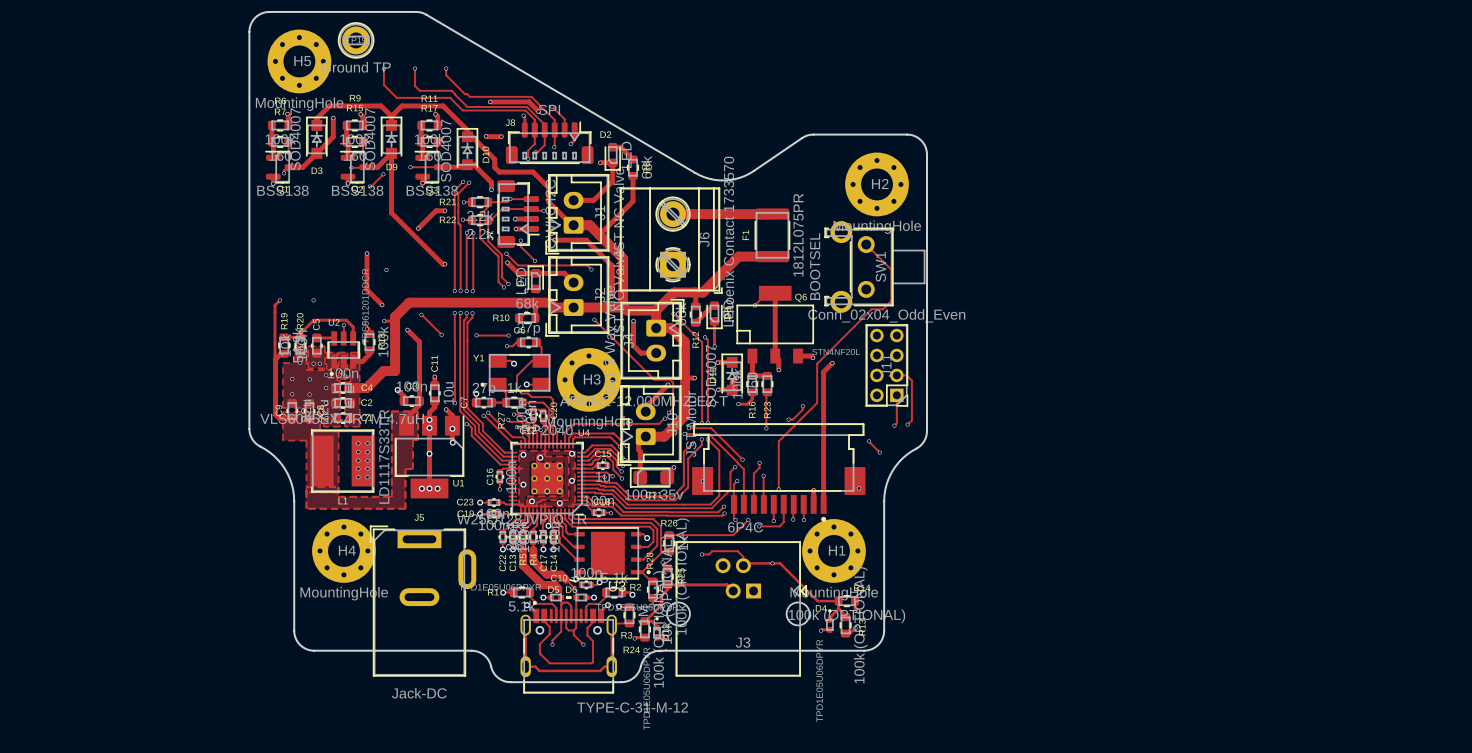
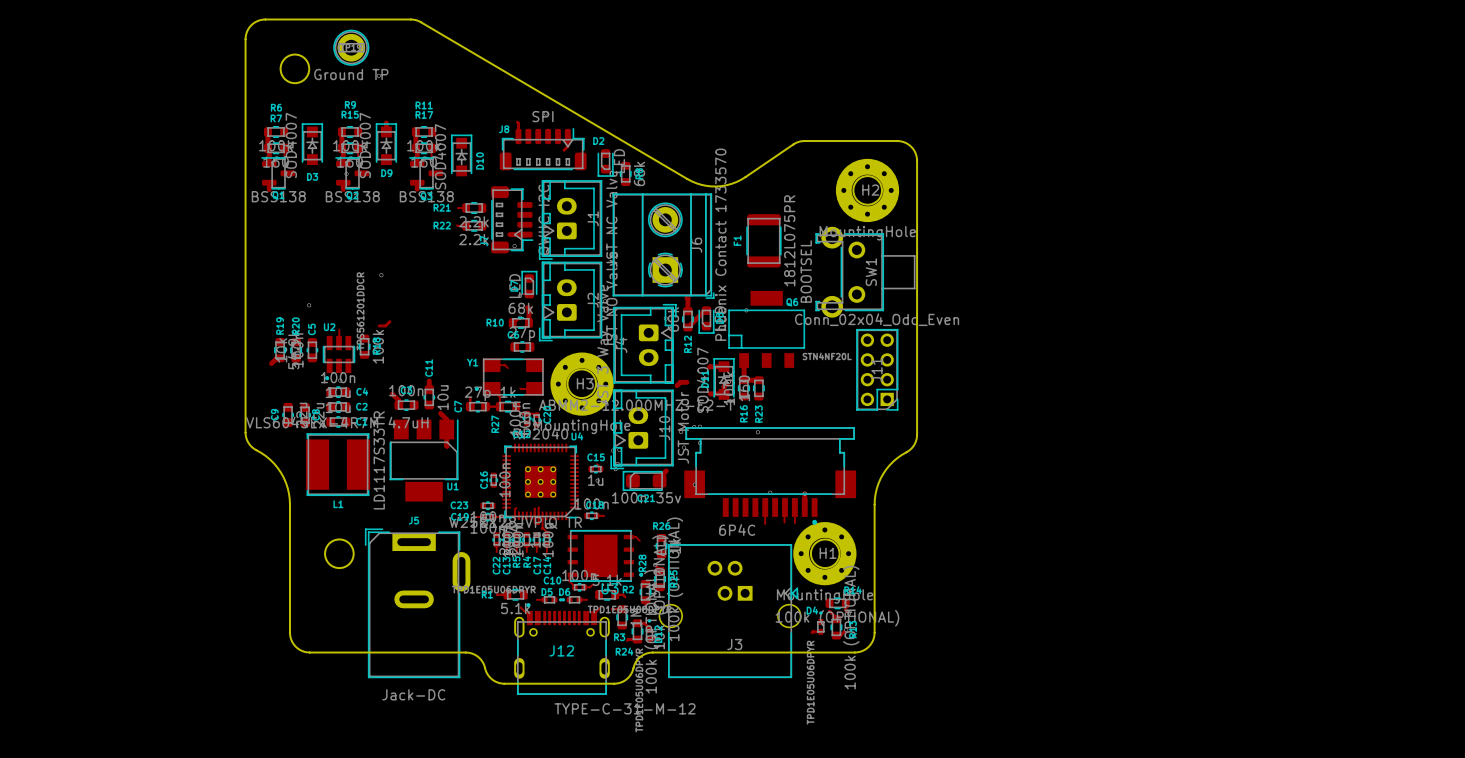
round board edge: none -> [279, 53, 311, 85]
H5: MountingHole (299, 61) -> none
track: (383, 68) (383, 84) (396, 97) (450, 97) (462, 110) (525, 110) (534, 119) (534, 143) (528, 150) (528, 158) -> none
track: (415, 68) (415, 85) (419, 90) (451, 90) (467, 107) (526, 107) (544, 124) (544, 145) (535, 152) -> none
via: (415, 68) -> none
track: (446, 68) (446, 75) (469, 96) (531, 96) (554, 120) (554, 147) -> none
via: (446, 68) -> none
track: (490, 101) (528, 101) (538, 111) -> none
via: (490, 101) -> none
track: (552, 106) (564, 119) (564, 129) -> none
via: (538, 111) -> none
track: (287, 114) (288, 125) -> none
via: (287, 114) -> none
track: (360, 114) (363, 116) (363, 125) -> none
via: (360, 114) -> none
track: (435, 114) (437, 116) (437, 125) -> none
via: (435, 114) -> none
via: (523, 115) -> none
track: (333, 118) (333, 136) (302, 167) (292, 167) (288, 170) (283, 170) (283, 173) -> none
via: (333, 118) -> none
track: (316, 125) (316, 118) (329, 105) (381, 105) (391, 116) (401, 105) (443, 105) (467, 130) (467, 136) (472, 136) (494, 159) (494, 167) (499, 172) (533, 172) (548, 187) (548, 202) (571, 225) (589, 225) (623, 258) (623, 306) (627, 310) (656, 310) -> none
track: (486, 136) (501, 136) -> none
via: (486, 136) -> none
via: (501, 136) -> none
via: (570, 143) -> none
via: (554, 147) -> none
track: (612, 147) (620, 147) (633, 159) -> none
via: (535, 152) -> none
via: (528, 158) -> none
track: (600, 162) (612, 162) (612, 181) (593, 200) (573, 200) -> none
via: (600, 162) -> none
track: (351, 167) (377, 167) (391, 153) (391, 212) (444, 264) -> none
track: (410, 167) (464, 167) (467, 164) (473, 164) (491, 182) (491, 189) -> none
via: (410, 167) -> none
round board edge: none -> [852, 175, 884, 206]
via: (283, 173) -> none
track: (383, 174) (370, 186) -> none
via: (383, 174) -> none
track: (633, 175) (633, 201) (599, 234) -> none
track: (463, 181) (454, 190) (454, 291) -> none
via: (463, 181) -> none
track: (469, 182) (458, 193) (458, 223) (460, 225) (460, 290) -> none
via: (469, 182) -> none
via: (273, 183) -> none
via: (347, 183) -> none
via: (422, 183) -> none
via: (370, 186) -> none
via: (491, 189) -> none
via: (510, 199) -> none
track: (531, 199) (488, 202) (488, 206) (480, 215) (480, 238) (498, 256) (498, 281) (503, 287) -> none
via: (463, 202) -> none
track: (444, 210) (436, 210) (418, 228) -> none
via: (444, 210) -> none
track: (543, 210) (502, 209) (491, 220) (488, 220) (488, 241) (501, 254) (501, 277) (508, 283) -> none
via: (543, 210) -> none
track: (672, 214) (772, 214) -> none
via: (462, 219) -> none
track: (515, 219) (531, 219) -> none
via: (515, 219) -> none
via: (418, 228) -> none
via: (516, 229) -> none
track: (466, 232) (466, 291) -> none
via: (466, 232) -> none
track: (473, 233) (472, 291) -> none
via: (473, 233) -> none
track: (520, 240) (520, 246) (535, 260) -> none
track: (554, 240) (586, 240) (612, 265) (612, 296) -> none
via: (554, 240) -> none
track: (866, 244) (891, 269) (891, 300) (883, 309) (871, 309) (817, 363) (817, 402) (778, 441) (778, 489) -> none
track: (366, 253) (366, 289) (382, 304) -> none
via: (366, 253) -> none
track: (506, 253) (518, 265) (587, 265) (591, 269) -> none
via: (506, 253) -> none
track: (772, 256) (738, 256) (702, 292) (674, 292) (656, 310) -> none
via: (535, 260) -> none
track: (507, 262) (518, 273) (564, 273) (573, 282) -> none
via: (507, 262) -> none
via: (444, 264) -> none
via: (591, 269) -> none
via: (508, 283) -> none
via: (503, 287) -> none
via: (460, 290) -> none
via: (454, 291) -> none
via: (466, 291) -> none
via: (472, 291) -> none
track: (279, 300) (275, 305) (275, 414) (279, 418) (292, 418) -> none
via: (279, 300) -> none
via: (382, 304) -> none
track: (754, 305) (766, 293) (775, 293) (775, 356) (778, 359) (778, 369) -> none
track: (624, 307) (554, 307) (549, 302) (409, 302) (395, 316) (395, 370) (383, 370) (366, 387) (350, 387) -> none
track: (656, 310) (656, 328) (671, 328) (684, 341) (684, 416) (664, 436) (645, 436) (638, 443) (640, 477) -> none
track: (454, 313) (455, 403) -> none
via: (454, 313) -> none
track: (460, 313) (460, 410) (475, 426) (475, 433) (502, 460) (512, 460) -> none
via: (460, 313) -> none
track: (466, 313) (466, 317) (463, 320) (463, 409) (478, 424) (478, 431) (503, 456) (512, 456) -> none
via: (466, 313) -> none
track: (472, 313) (472, 317) (467, 322) (467, 408) (482, 423) (482, 430) (504, 452) (512, 452) -> none
via: (472, 313) -> none
track: (673, 313) (702, 342) (702, 423) -> none
track: (421, 314) (441, 334) -> none
via: (421, 314) -> none
track: (594, 319) (654, 379) (670, 379) (673, 382) (673, 408) (668, 412) -> none
via: (594, 319) -> none
via: (384, 321) -> none
track: (633, 321) (633, 345) (640, 353) (656, 353) -> none
via: (633, 321) -> none
track: (714, 321) (714, 346) -> none
track: (364, 323) (369, 328) (369, 333) -> none
via: (364, 323) -> none
via: (343, 325) -> none
track: (407, 329) (419, 342) (419, 405) (406, 417) (406, 425) -> none
via: (407, 329) -> none
via: (441, 334) -> none
track: (476, 335) (508, 335) -> none
via: (476, 335) -> none
via: (508, 335) -> none
track: (284, 337) (300, 337) (300, 333) (313, 320) (346, 320) (353, 327) (353, 338) -> none
track: (316, 337) (334, 338) -> none
track: (705, 337) (707, 340) (707, 422) -> none
via: (705, 337) -> none
track: (520, 342) (516, 342) (512, 346) (506, 346) -> none
track: (536, 342) (541, 347) (541, 360) (532, 360) (517, 375) (517, 388) (521, 393) (528, 393) (531, 397) (550, 397) (553, 399) (553, 444) -> none
zone outline: (294, 346) (294, 362) (282, 362) (282, 407) (323, 407) (323, 426) (340, 426) (340, 380) (337, 380) (337, 352) (326, 352) (326, 370) (306, 370) (306, 346) (294, 346) -> none
zone outline: (308, 346) (308, 368) (324, 368) (324, 346) (308, 346) -> none
via: (506, 346) -> none
via: (714, 346) -> none
track: (369, 350) (369, 354) (362, 361) (353, 361) -> none
zone outline: (338, 352) (347, 352) (347, 378) (338, 378) (338, 352) -> none
zone outline: (350, 352) (350, 382) (344, 382) (344, 426) (359, 426) (359, 352) (350, 352) -> none
track: (798, 356) (811, 356) (812, 357) -> none
via: (812, 357) -> none
via: (300, 362) -> none
via: (717, 362) -> none
via: (313, 363) -> none
via: (319, 363) -> none
via: (514, 363) -> none
track: (832, 363) (823, 371) (823, 504) -> none
via: (832, 363) -> none
round board edge: none -> [566, 368, 598, 400]
via: (778, 369) -> none
via: (341, 372) -> none
via: (326, 375) -> none
track: (896, 375) (906, 375) (911, 380) (911, 420) (907, 424) -> none
via: (434, 376) -> none
via: (694, 378) -> none
via: (292, 379) -> none
via: (309, 379) -> none
via: (526, 384) -> none
track: (668, 384) (645, 407) (645, 411) -> none
via: (668, 384) -> none
via: (326, 387) -> none
via: (397, 389) -> none
via: (718, 389) -> none
track: (752, 392) (752, 399) (747, 404) (738, 404) -> none
track: (767, 392) (766, 428) -> none
via: (476, 393) -> none
via: (292, 394) -> none
via: (309, 394) -> none
track: (896, 395) (896, 423) (894, 425) -> none
track: (434, 400) (434, 407) (429, 412) (429, 488) -> none
via: (326, 402) -> none
track: (522, 402) (543, 402) (549, 408) (549, 444) -> none
via: (455, 403) -> none
via: (738, 404) -> none
track: (802, 406) (802, 409) (792, 419) (788, 419) -> none
via: (802, 406) -> none
via: (446, 409) -> none
track: (488, 412) (512, 437) (523, 437) (525, 444) -> none
via: (488, 412) -> none
via: (668, 412) -> none
track: (514, 414) (519, 414) (537, 432) (537, 444) -> none
via: (514, 414) -> none
track: (483, 415) (513, 444) (521, 444) -> none
via: (483, 415) -> none
track: (665, 418) (658, 423) (573, 423) (565, 432) (565, 444) -> none
via: (665, 418) -> none
via: (429, 419) -> none
track: (508, 419) (510, 421) (521, 421) (533, 434) -> none
via: (508, 419) -> none
track: (533, 419) (533, 423) (541, 430) (541, 444) -> none
via: (788, 419) -> none
track: (543, 420) (545, 425) (545, 454) -> none
track: (466, 424) (471, 427) (471, 435) (500, 464) (512, 464) -> none
via: (466, 424) -> none
via: (907, 424) -> none
via: (894, 425) -> none
via: (429, 427) -> none
track: (516, 427) (519, 427) (529, 436) (529, 444) -> none
via: (516, 427) -> none
via: (452, 428) -> none
track: (688, 428) (711, 428) (742, 459) -> none
via: (540, 429) -> none
track: (558, 429) (557, 444) -> none
via: (558, 429) -> none
track: (533, 434) (533, 444) -> none
track: (684, 434) (709, 434) (743, 469) (743, 504) -> none
via: (684, 434) -> none
track: (701, 439) (701, 444) (688, 458) (688, 487) (675, 500) (628, 500) (615, 486) (581, 484) -> none
via: (701, 439) -> none
track: (707, 439) (719, 450) (719, 495) (710, 504) (627, 504) (613, 490) (581, 488) -> none
track: (869, 441) (879, 452) -> none
via: (869, 441) -> none
via: (452, 442) -> none
via: (358, 443) -> none
via: (367, 443) -> none
track: (691, 443) (683, 451) (683, 485) (672, 496) (629, 496) (616, 482) (581, 480) -> none
track: (569, 444) (569, 437) (573, 433) (614, 433) (626, 446) -> none
track: (573, 444) (574, 437) (610, 437) (620, 446) -> none
zone outline: (519, 450) (574, 450) (574, 506) (519, 506) (519, 450) -> none
via: (358, 451) -> none
via: (367, 452) -> none
track: (581, 452) (585, 452) (592, 445) (611, 445) (624, 460) -> none
via: (879, 452) -> none
via: (429, 453) -> none
via: (572, 453) -> none
via: (523, 454) -> none
zone outline: (536, 454) (536, 462) (562, 462) (562, 496) (526, 496) (526, 506) (536, 506) (536, 502) (540, 502) (540, 500) (568, 500) (568, 456) (536, 454) -> none
track: (581, 456) (587, 456) (595, 448) (610, 448) (620, 459) (622, 465) -> none
via: (540, 457) -> none
via: (742, 459) -> none
via: (358, 460) -> none
via: (367, 460) -> none
track: (581, 460) (588, 460) (597, 452) (608, 452) (616, 460) (616, 466) (621, 471) -> none
via: (604, 460) -> none
track: (759, 462) (759, 467) (753, 473) (753, 504) -> none
via: (759, 462) -> none
track: (581, 464) (591, 464) (595, 459) (606, 456) (613, 462) (613, 469) (622, 478) -> none
track: (596, 464) (592, 468) (573, 468) -> none
via: (674, 467) -> none
track: (735, 467) (730, 471) (730, 489) (711, 508) (626, 508) (611, 494) (581, 492) -> none
via: (735, 467) -> none
via: (358, 468) -> none
via: (367, 468) -> none
track: (521, 468) (503, 468) (499, 472) -> none
via: (621, 471) -> none
track: (581, 472) (607, 472) (612, 476) -> none
track: (763, 475) (763, 504) -> none
via: (763, 475) -> none
track: (581, 476) (604, 477) -> none
via: (612, 476) -> none
via: (358, 477) -> none
via: (367, 477) -> none
via: (622, 478) -> none
via: (572, 480) -> none
track: (499, 481) (499, 489) -> none
track: (737, 481) (733, 484) (735, 520) -> none
via: (737, 481) -> none
via: (523, 484) -> none
zone outline: (306, 487) (338, 487) (338, 496) (391, 496) (391, 411) (417, 411) (417, 440) (413, 440) (413, 468) (405, 468) (405, 508) (306, 508) (306, 440) (282, 440) (282, 412) (320, 412) (320, 431) (338, 431) (338, 492) (306, 492) -> none
via: (421, 488) -> none
via: (429, 488) -> none
via: (437, 488) -> none
via: (859, 488) -> none
via: (499, 489) -> none
track: (581, 496) (587, 496) (594, 502) (614, 502) (623, 511) (718, 512) (723, 506) -> none
track: (581, 500) (586, 500) (592, 506) (612, 506) (621, 515) (722, 515) (724, 513) -> none
via: (532, 501) -> none
track: (480, 502) (489, 502) -> none
via: (480, 502) -> none
track: (498, 502) (522, 504) (525, 507) (525, 519) (514, 520) (502, 532) -> none
track: (529, 502) (529, 520) (525, 523) (521, 523) (512, 532) -> none
via: (559, 503) -> none
track: (572, 504) (585, 504) (594, 512) -> none
track: (783, 504) (783, 522) (779, 526) (759, 526) -> none
via: (723, 506) -> none
track: (532, 512) (532, 522) (523, 531) -> none
track: (537, 512) (537, 525) (533, 531) -> none
track: (553, 512) (553, 520) (559, 528) (559, 542) (576, 559) (579, 559) -> none
track: (557, 512) (557, 519) (562, 526) (562, 535) (573, 546) (579, 546) -> none
track: (561, 512) (561, 521) (566, 525) (566, 531) (568, 534) (579, 534) -> none
track: (565, 512) (565, 519) (572, 526) (649, 526) (653, 530) (653, 541) (648, 546) (636, 546) -> none
track: (569, 512) (569, 518) (573, 522) (650, 522) (657, 529) (657, 545) (643, 559) (636, 559) -> none
track: (573, 512) (574, 519) (653, 519) (661, 526) (661, 553) -> none
via: (610, 513) -> none
via: (724, 513) -> none
via: (480, 514) -> none
via: (793, 519) -> none
via: (735, 520) -> none
track: (748, 520) (733, 535) (669, 535) -> none
via: (748, 520) -> none
via: (803, 520) -> none
track: (545, 521) (542, 523) (543, 532) -> none
via: (773, 521) -> none
via: (548, 525) -> none
via: (759, 526) -> none
round board edge: none -> [324, 538, 355, 570]
round board edge: none -> [809, 538, 841, 570]
via: (647, 538) -> none
via: (502, 549) -> none
track: (522, 549) (522, 565) (542, 585) (554, 585) (561, 591) (561, 597) -> none
track: (533, 549) (533, 561) (546, 574) (560, 574) (576, 590) (576, 628) (573, 630) -> none
via: (543, 549) -> none
via: (553, 549) -> none
H4: MountingHole (343, 550) -> none
track: (669, 551) (662, 551) (642, 572) -> none
track: (702, 554) (708, 554) (712, 551) (737, 551) (743, 556) (743, 565) (745, 563) (780, 563) (817, 601) (838, 601) (838, 608) (829, 619) -> none
via: (702, 554) -> none
via: (772, 563) -> none
track: (642, 572) (652, 581) -> none
via: (576, 578) -> none
line: (570, 579) (575, 581) -> none
via: (599, 582) -> none
track: (733, 590) (727, 584) (667, 584) (667, 589) (661, 595) (659, 606) (645, 621) -> none
track: (606, 591) (606, 596) (599, 603) (588, 603) (586, 606) (586, 615) -> none
via: (503, 592) -> none
track: (530, 592) (530, 596) (537, 603) (552, 603) (556, 607) (556, 615) -> none
via: (632, 594) -> none
via: (543, 597) -> none
track: (561, 597) (561, 631) (552, 640) (552, 644) -> none
via: (594, 597) -> none
via: (526, 605) -> none
track: (561, 605) (567, 602) (571, 605) (571, 615) -> none
via: (607, 605) -> none
via: (619, 606) -> none
track: (544, 615) (544, 621) (549, 626) (549, 634) (539, 644) (539, 653) (549, 663) (593, 661) (593, 641) (587, 635) (587, 627) (593, 622) (593, 615) -> none
track: (566, 615) (566, 627) (568, 630) (573, 630) -> none
track: (629, 623) (611, 625) (611, 666) (604, 666) (600, 670) (539, 670) (535, 666) (525, 666) (525, 625) -> none
track: (573, 630) (573, 634) (583, 644) -> none
via: (821, 630) -> none
via: (634, 638) -> none
via: (552, 644) -> none
via: (583, 644) -> none
J12 name: none -> J12 (561, 650)

